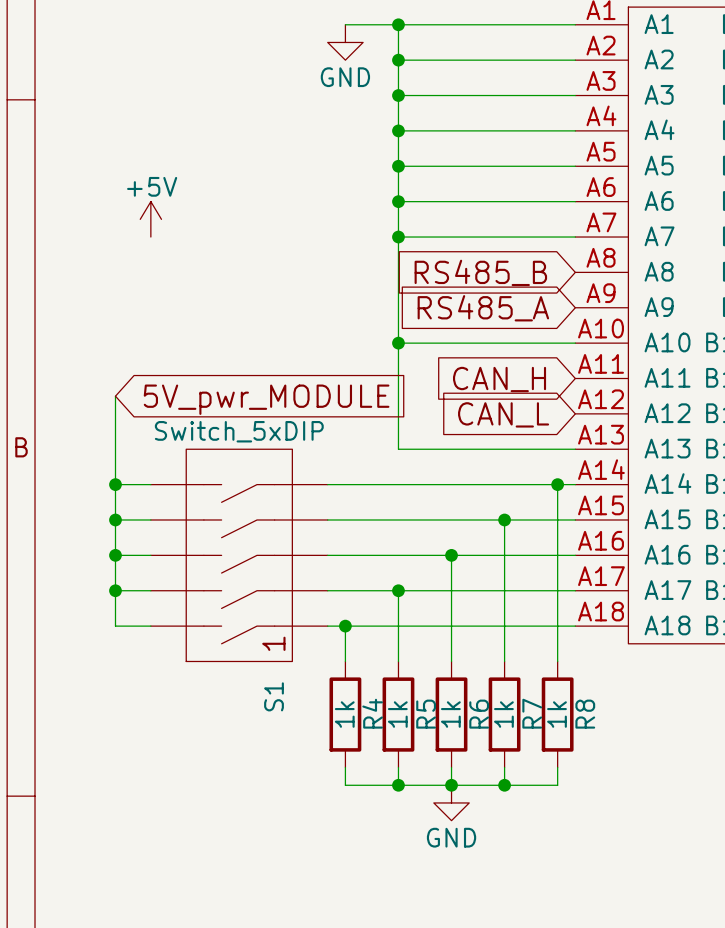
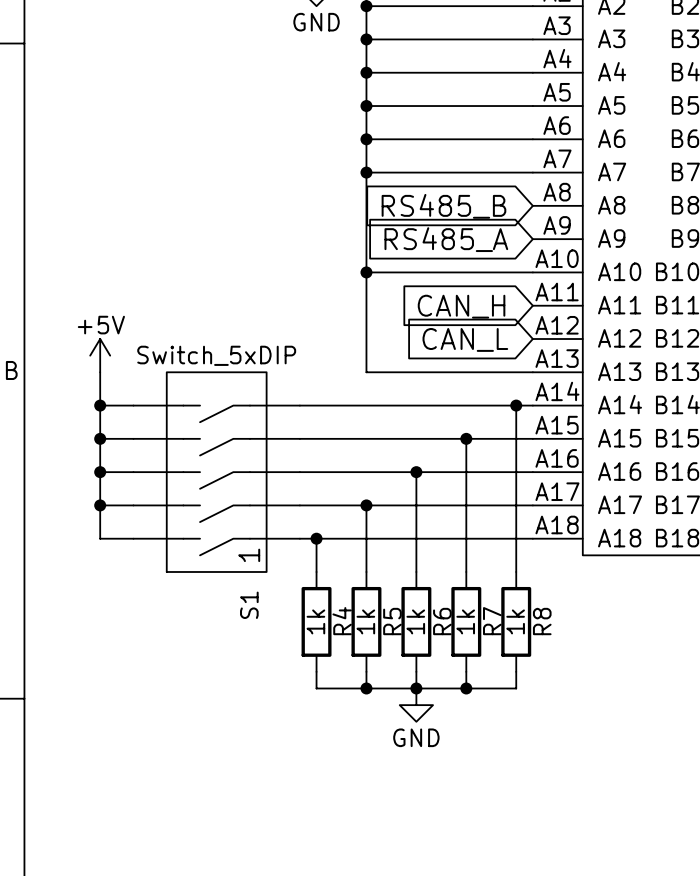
power symbol position: +5V (150, 219) -> +5V (100, 355)
global label: 5V_pwr_MODULE (266, 399) -> none

